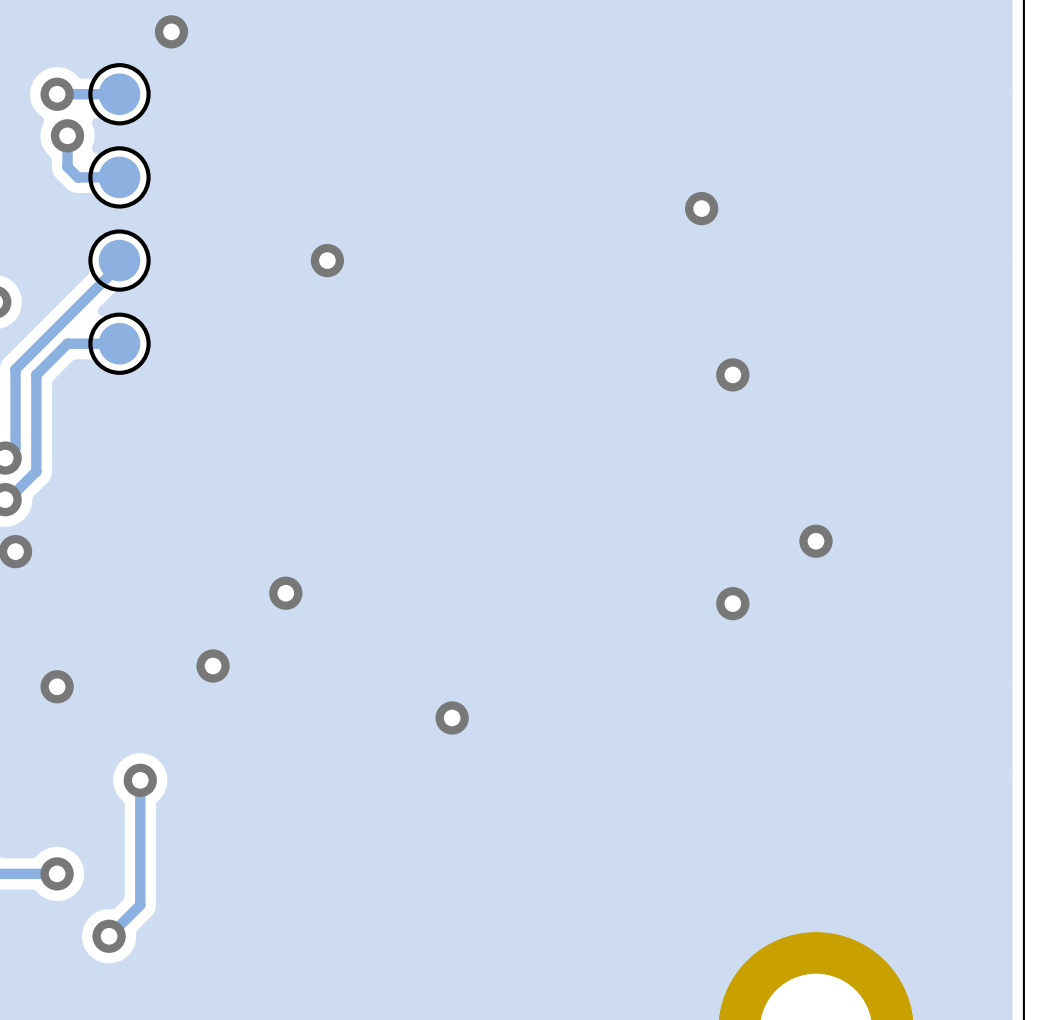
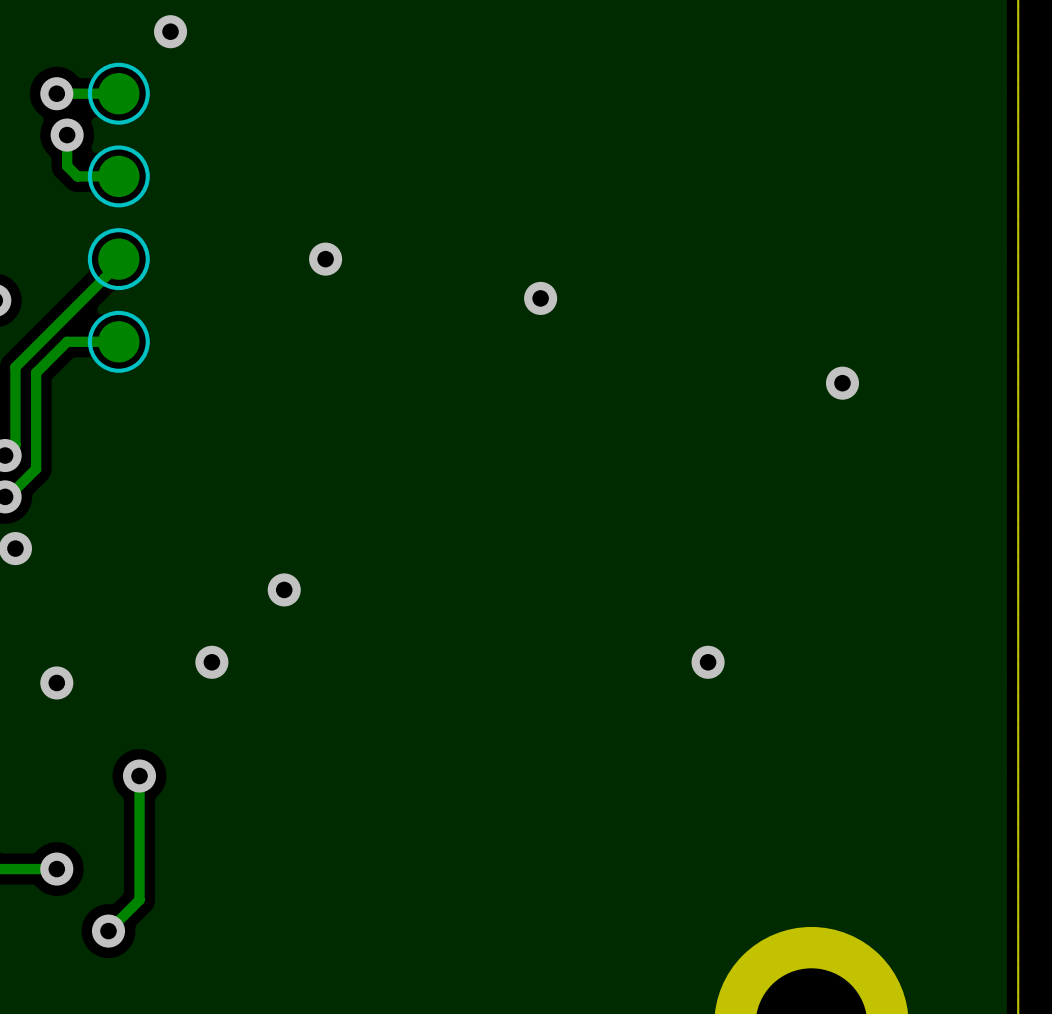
via: (701, 208) -> none
via: none -> (540, 298)
via: (732, 374) -> none
via: none -> (842, 383)
via: (816, 541) -> none
via position: (732, 603) -> (708, 662)
via: (452, 717) -> none

